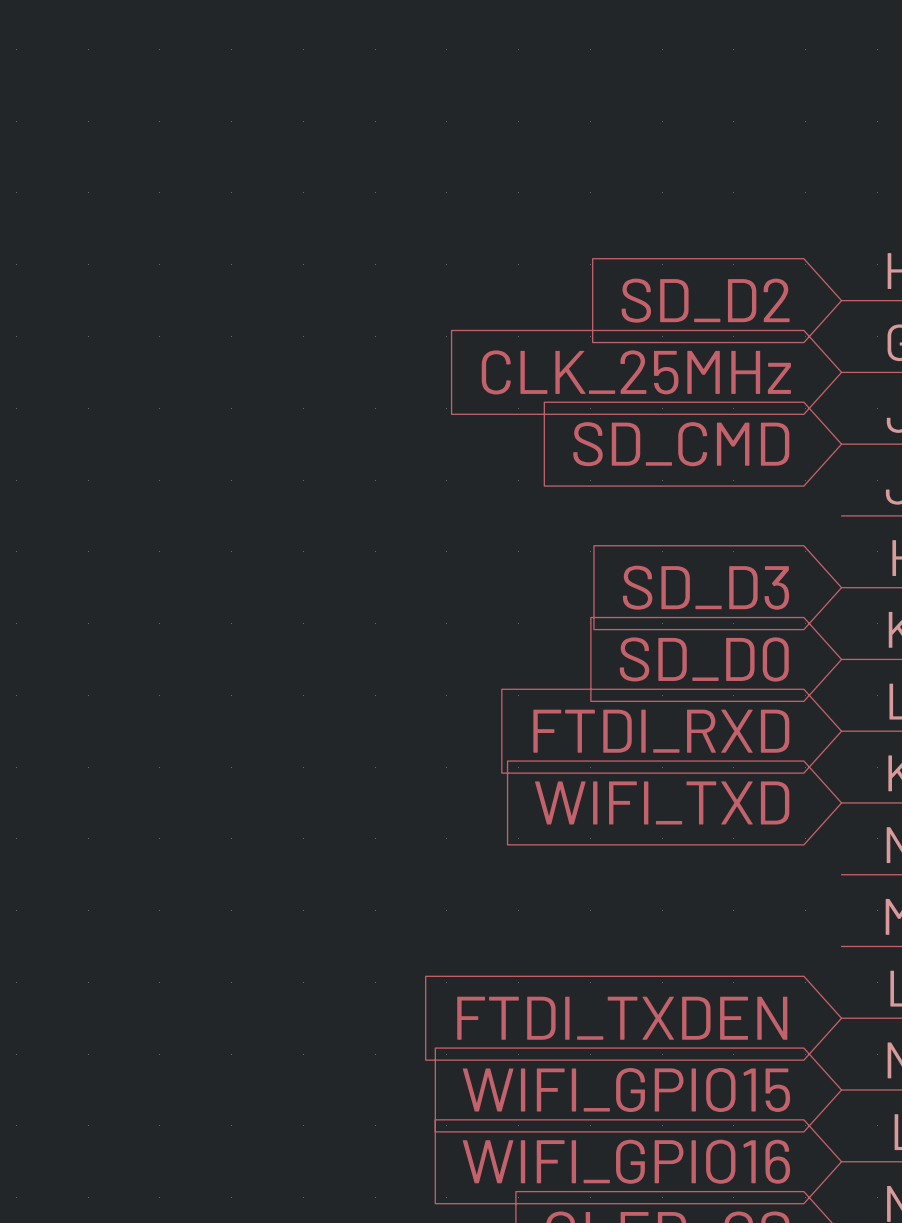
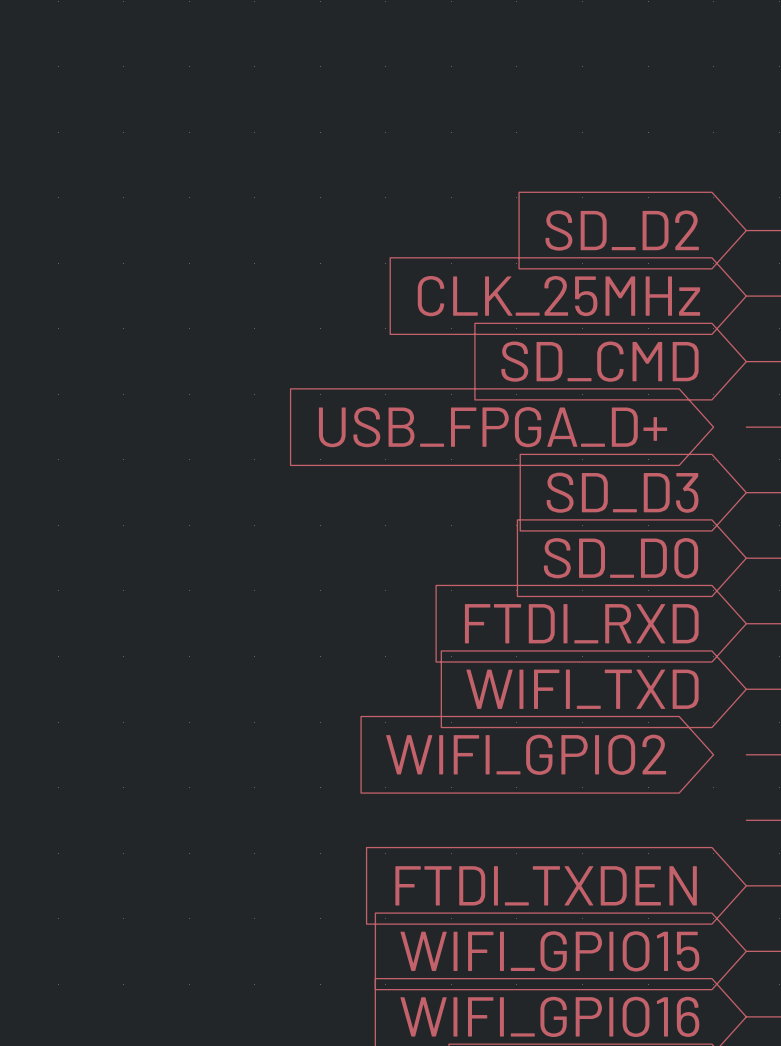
global label: none -> USB_FPGA_D+ (493, 427)
global label: none -> WIFI_GPIO2 (526, 754)

